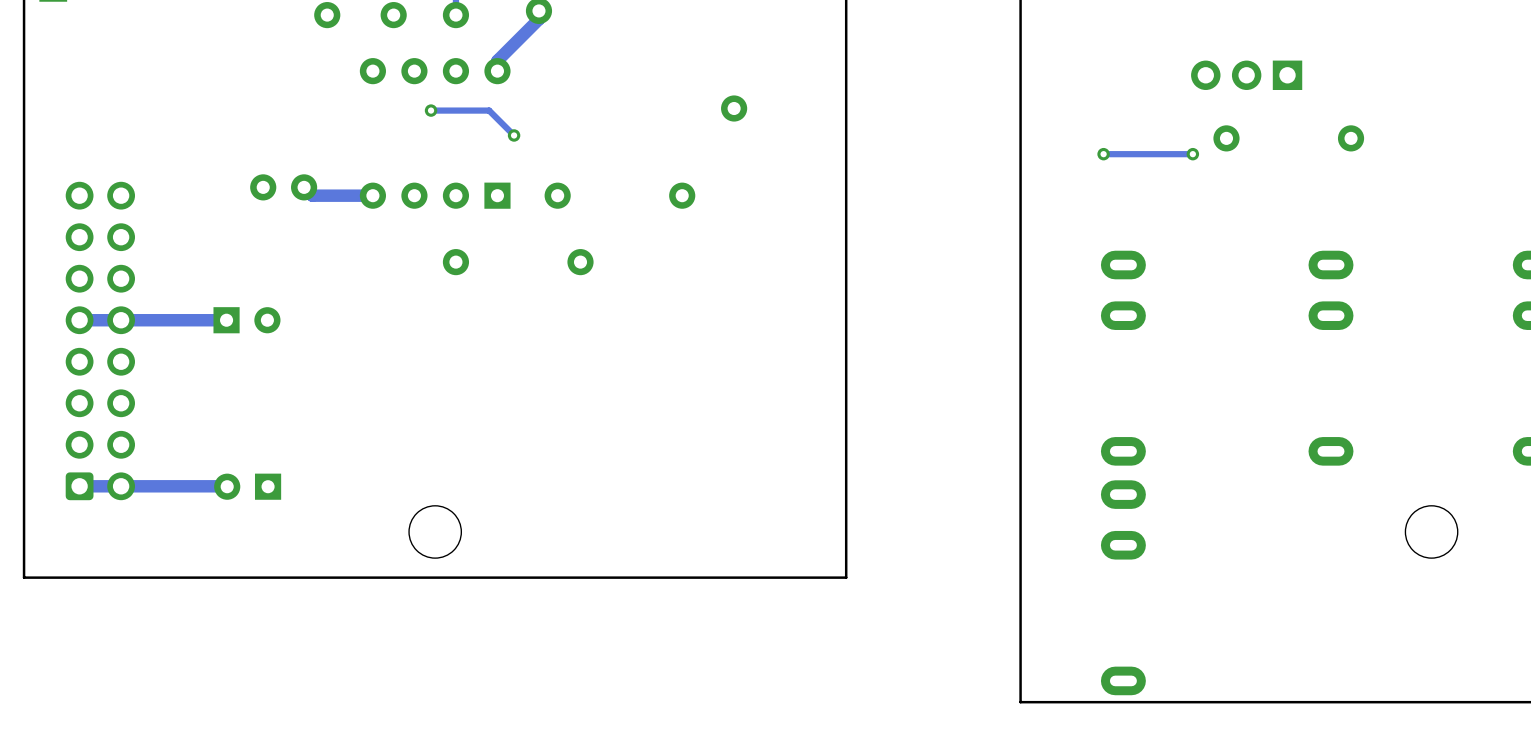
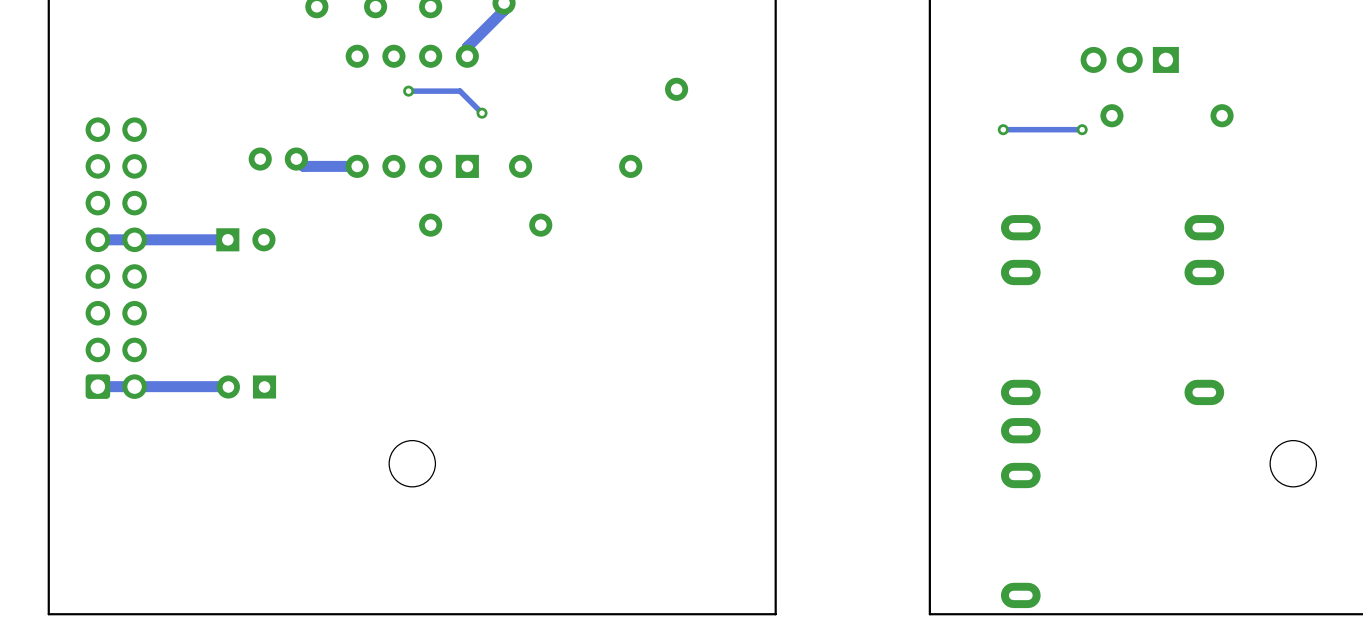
track: (226, 320) (79, 320) -> (227, 239) (97, 239)
part position: (246, 320) -> (245, 239)
part position: (100, 340) -> (116, 258)
track: (79, 486) (227, 486) -> (97, 386) (228, 387)
part position: (247, 486) -> (246, 387)
board edge: (846, 577) (24, 577) -> (775, 504) (775, 614) (48, 614) (48, 504)

